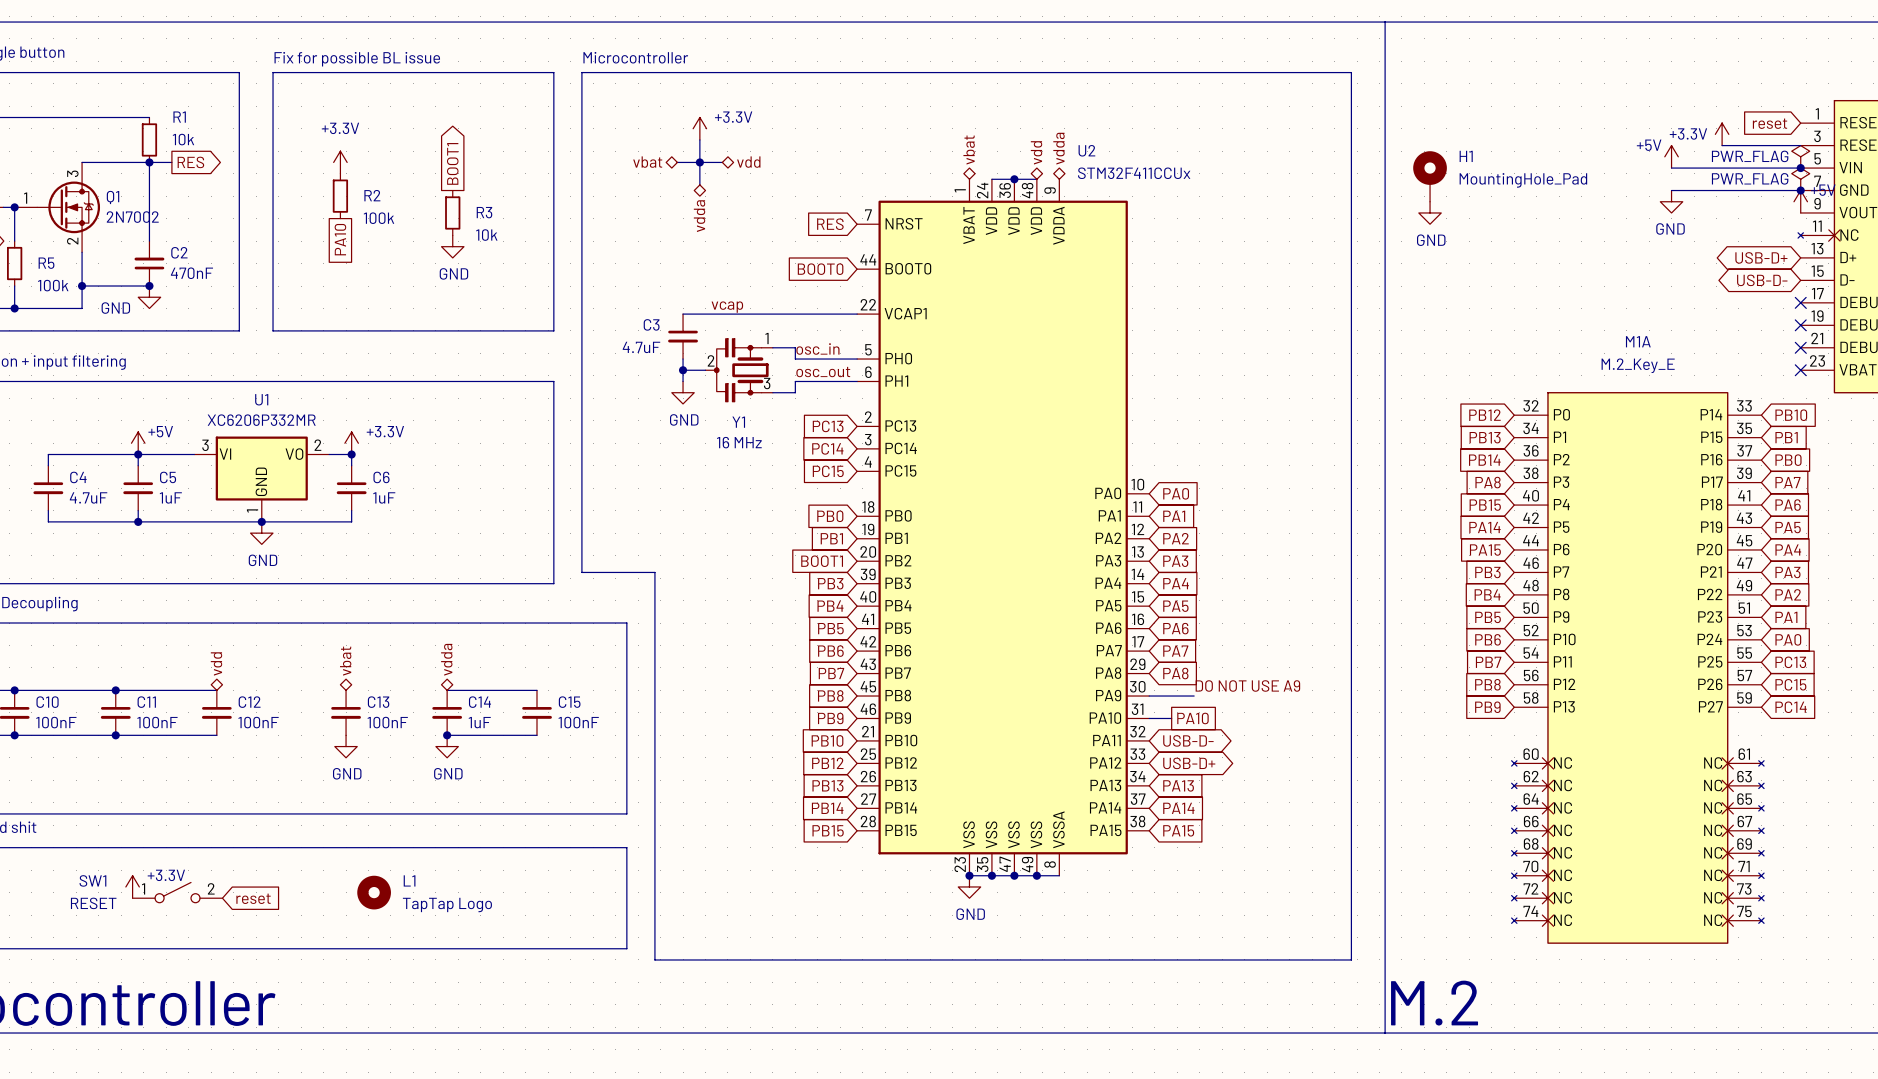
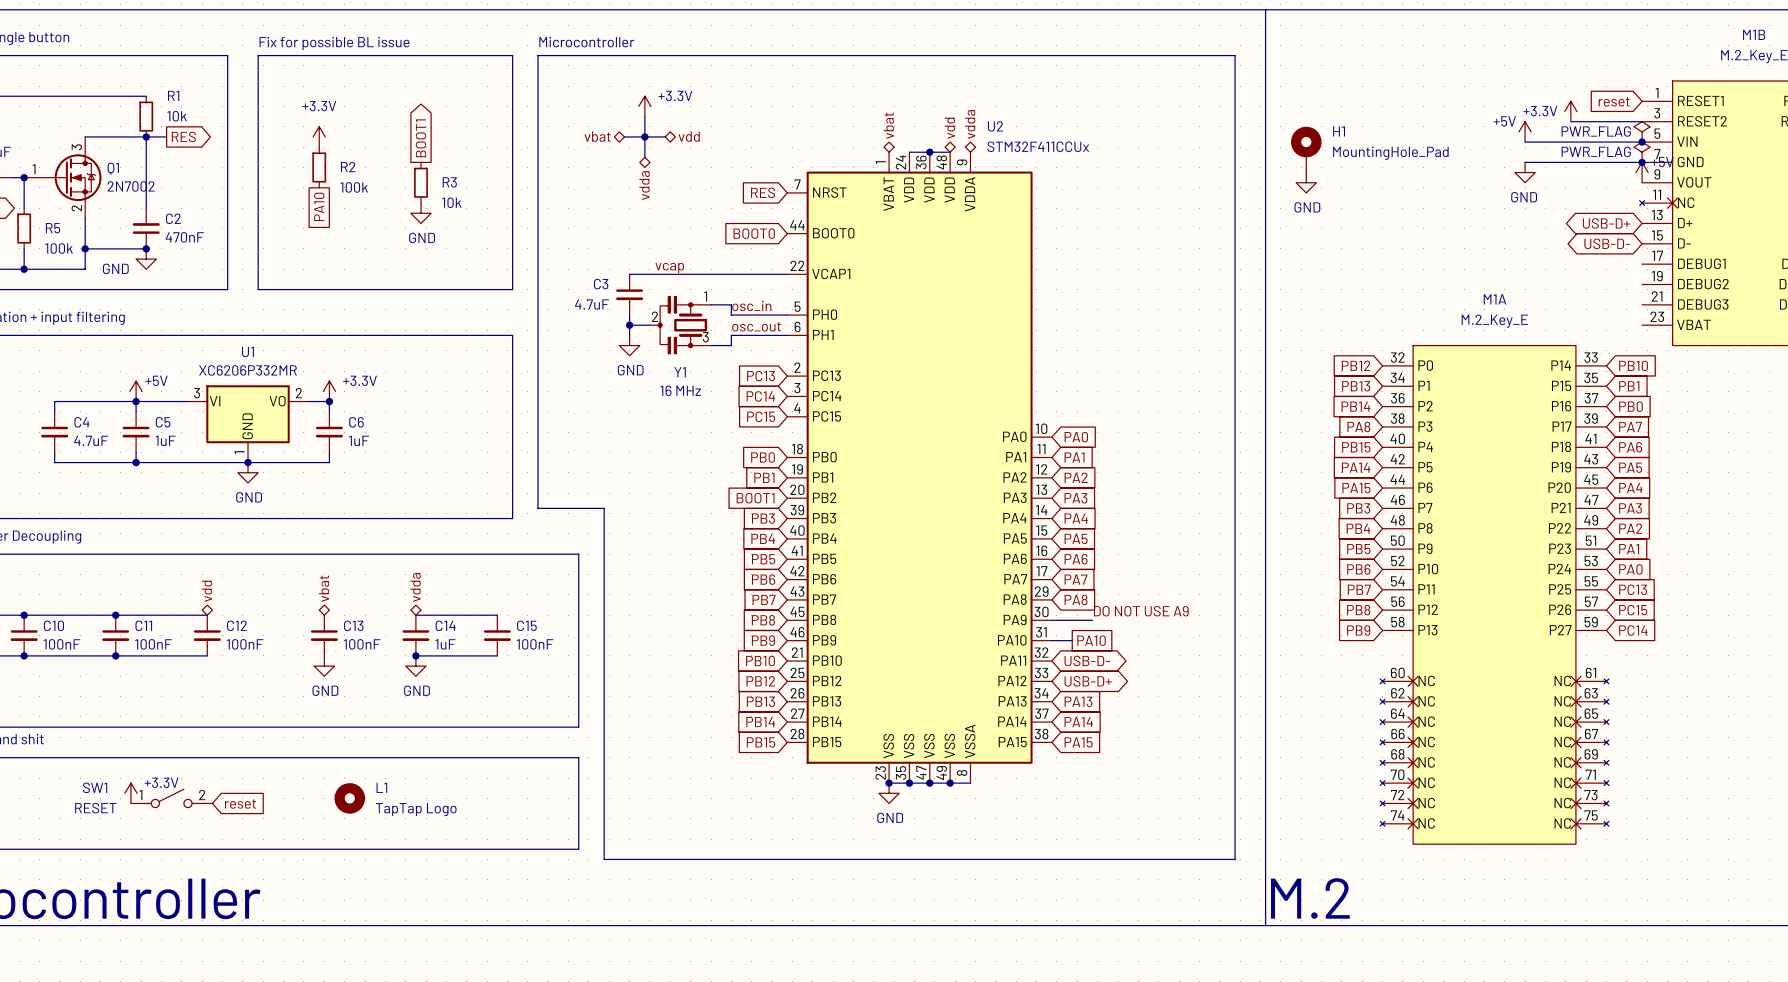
no-connect mark: (1800, 302) -> none
no-connect mark: (1800, 325) -> none
no-connect mark: (1800, 347) -> none
no-connect mark: (1800, 370) -> none

